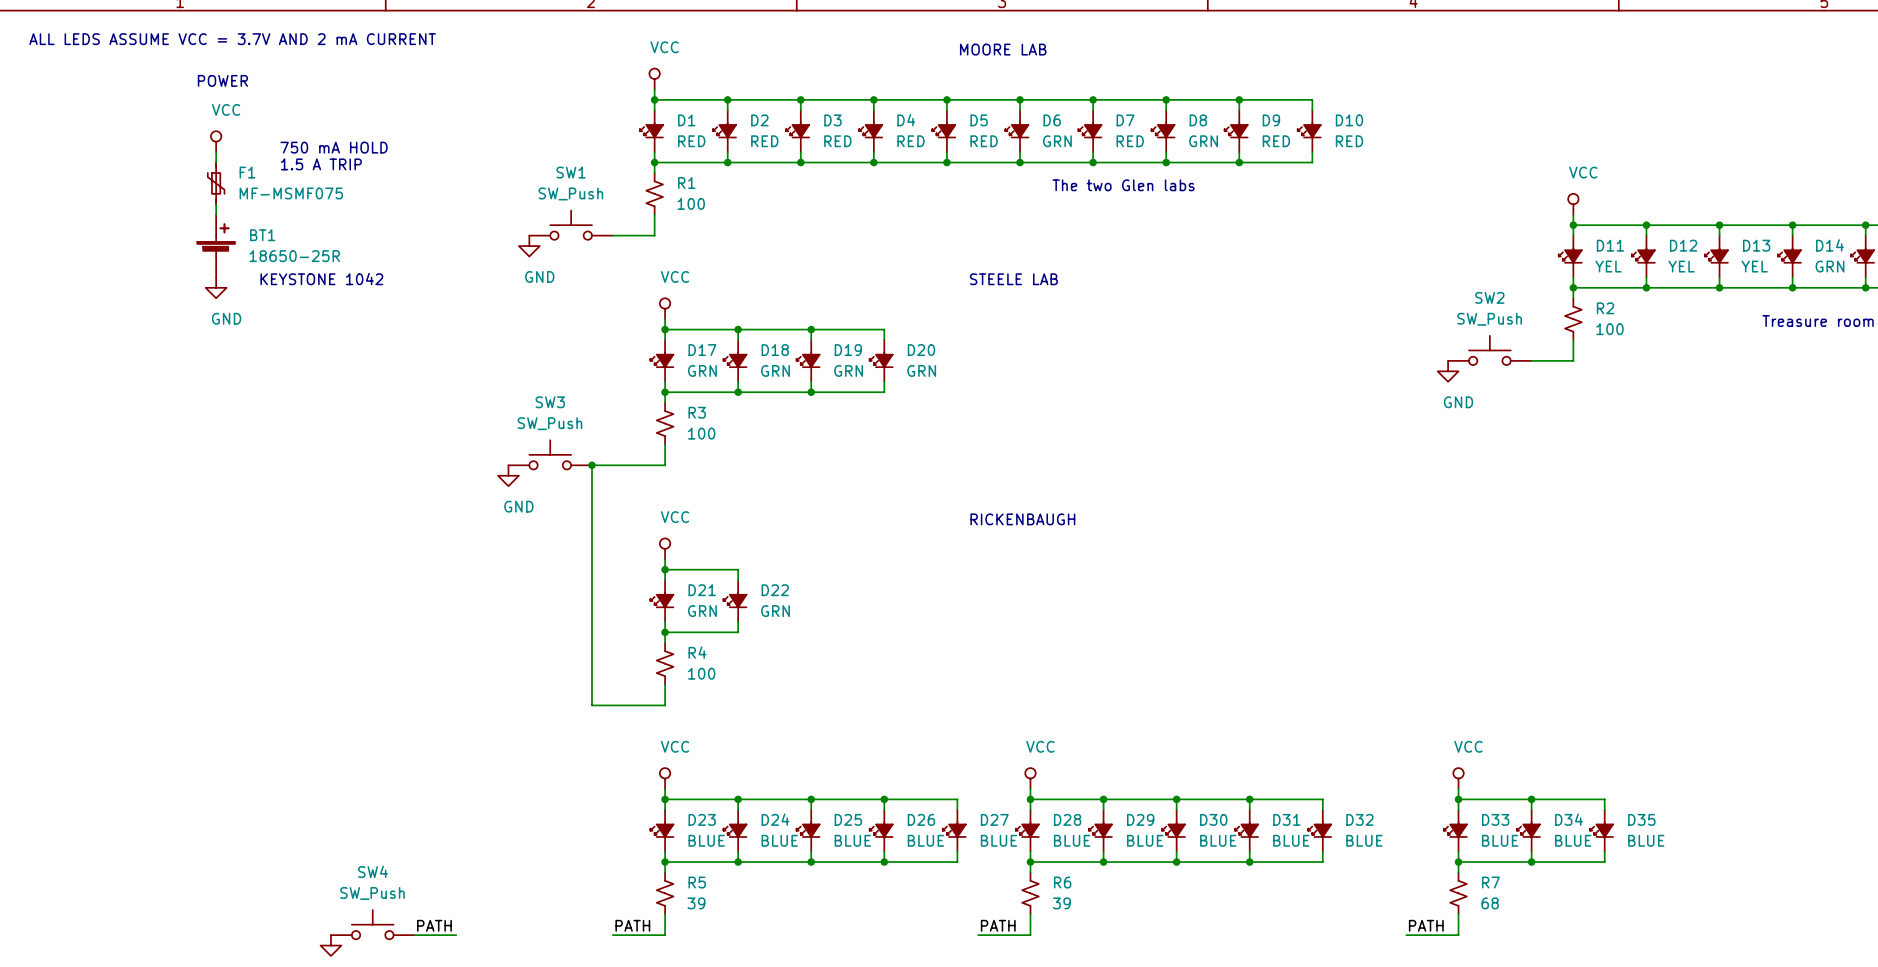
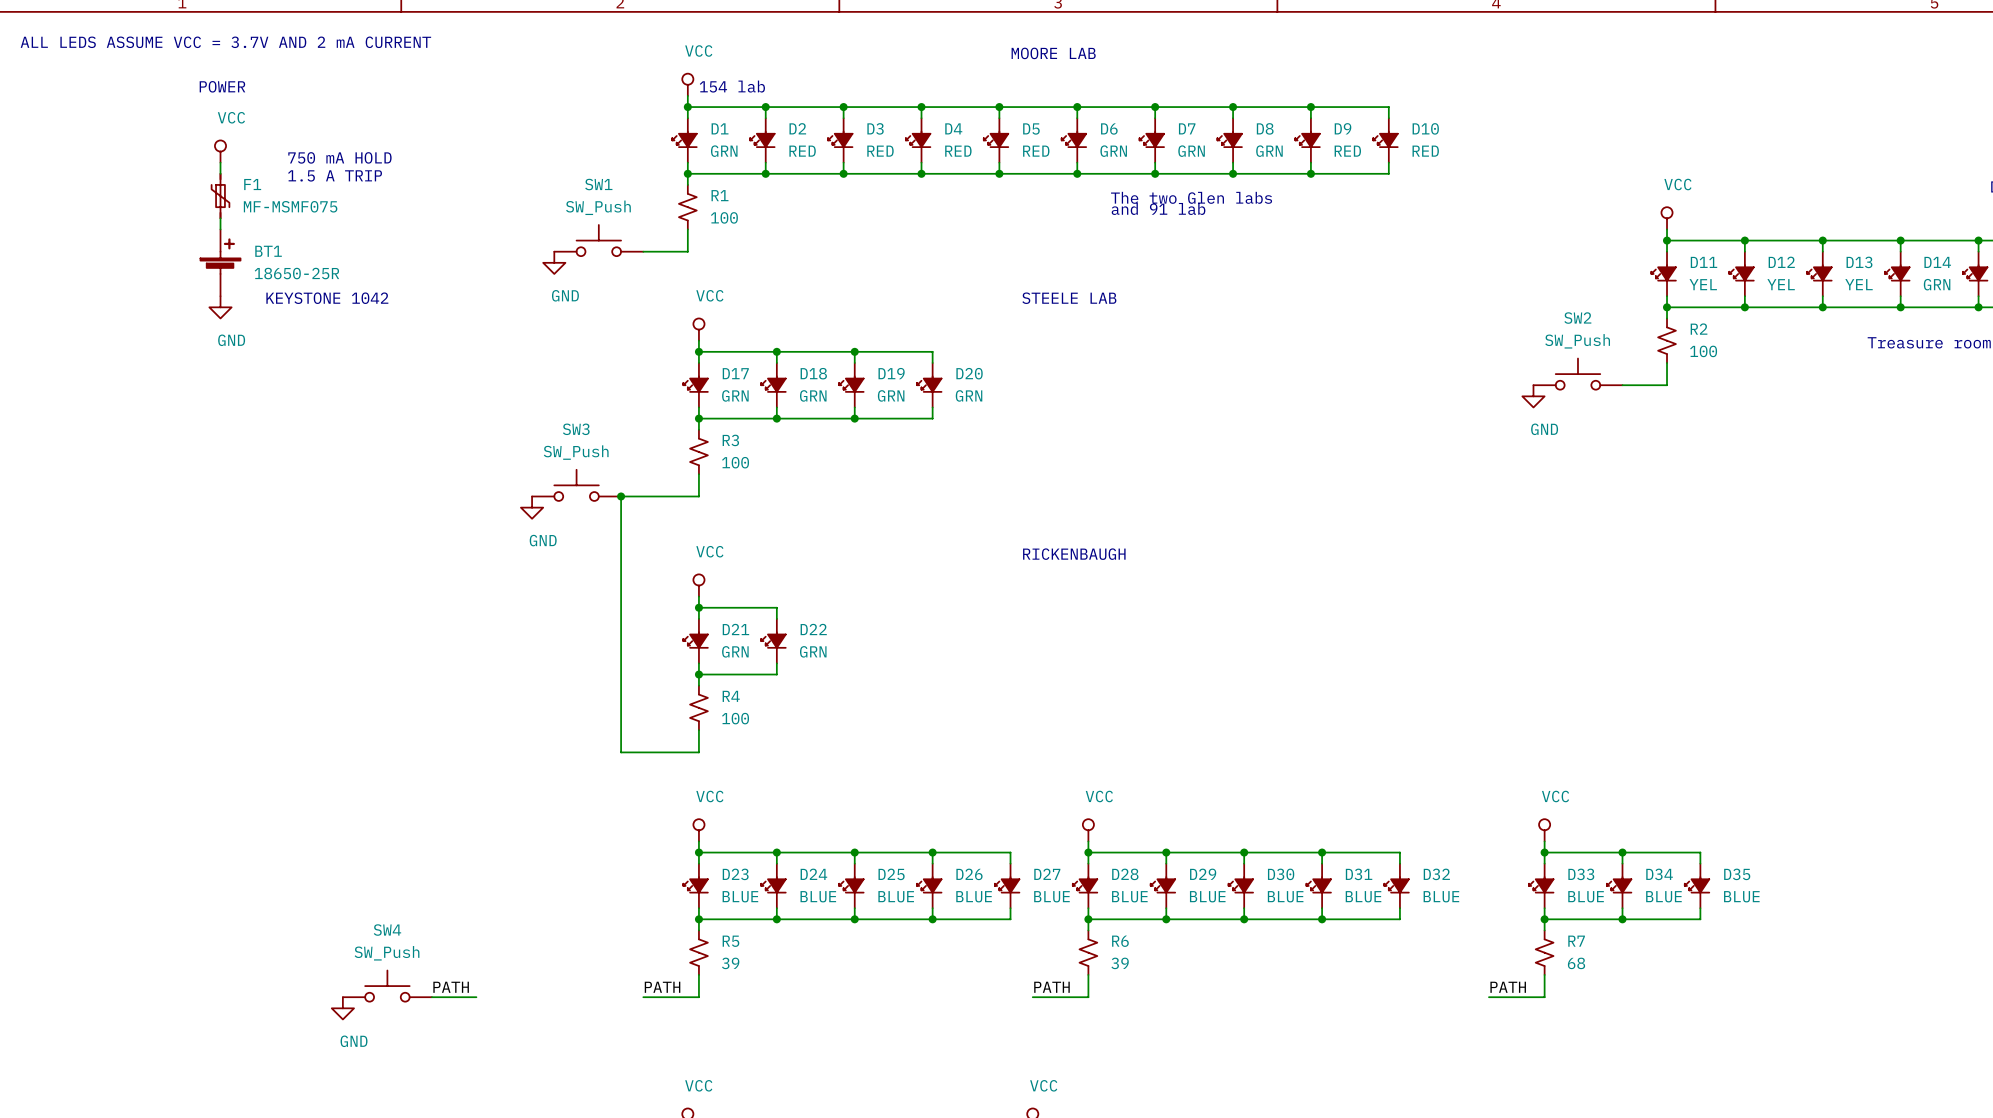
text: none -> 154 lab (732, 86)
D1 value: RED (691, 141) -> GRN (724, 151)
D7 value: RED (1130, 141) -> GRN (1191, 151)
text: none -> and 91 lab (1158, 208)

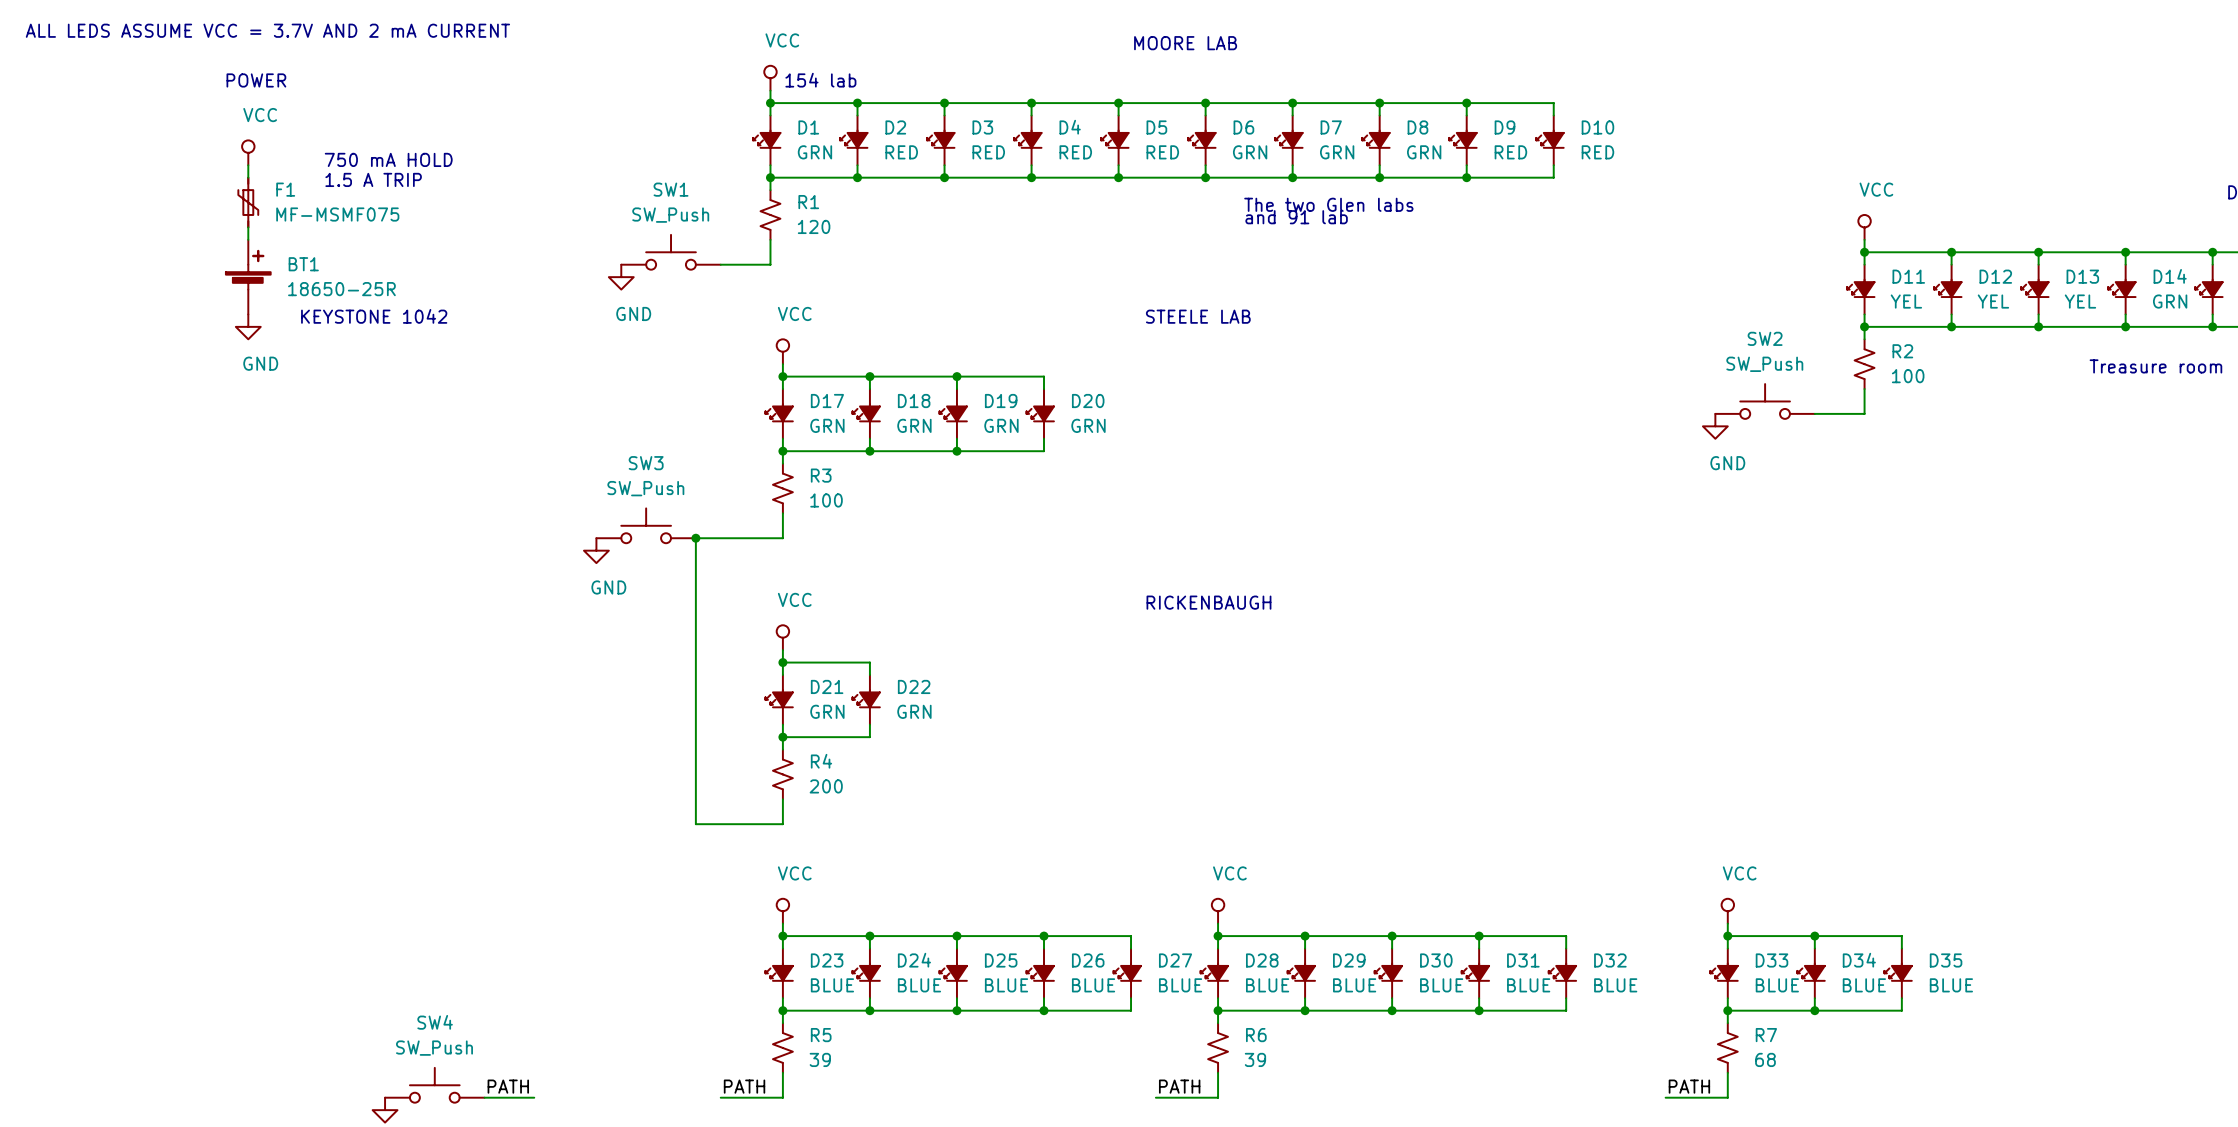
R1 value: 100 (724, 217) -> 120 (814, 226)
R4 value: 100 (735, 718) -> 200 (826, 786)

